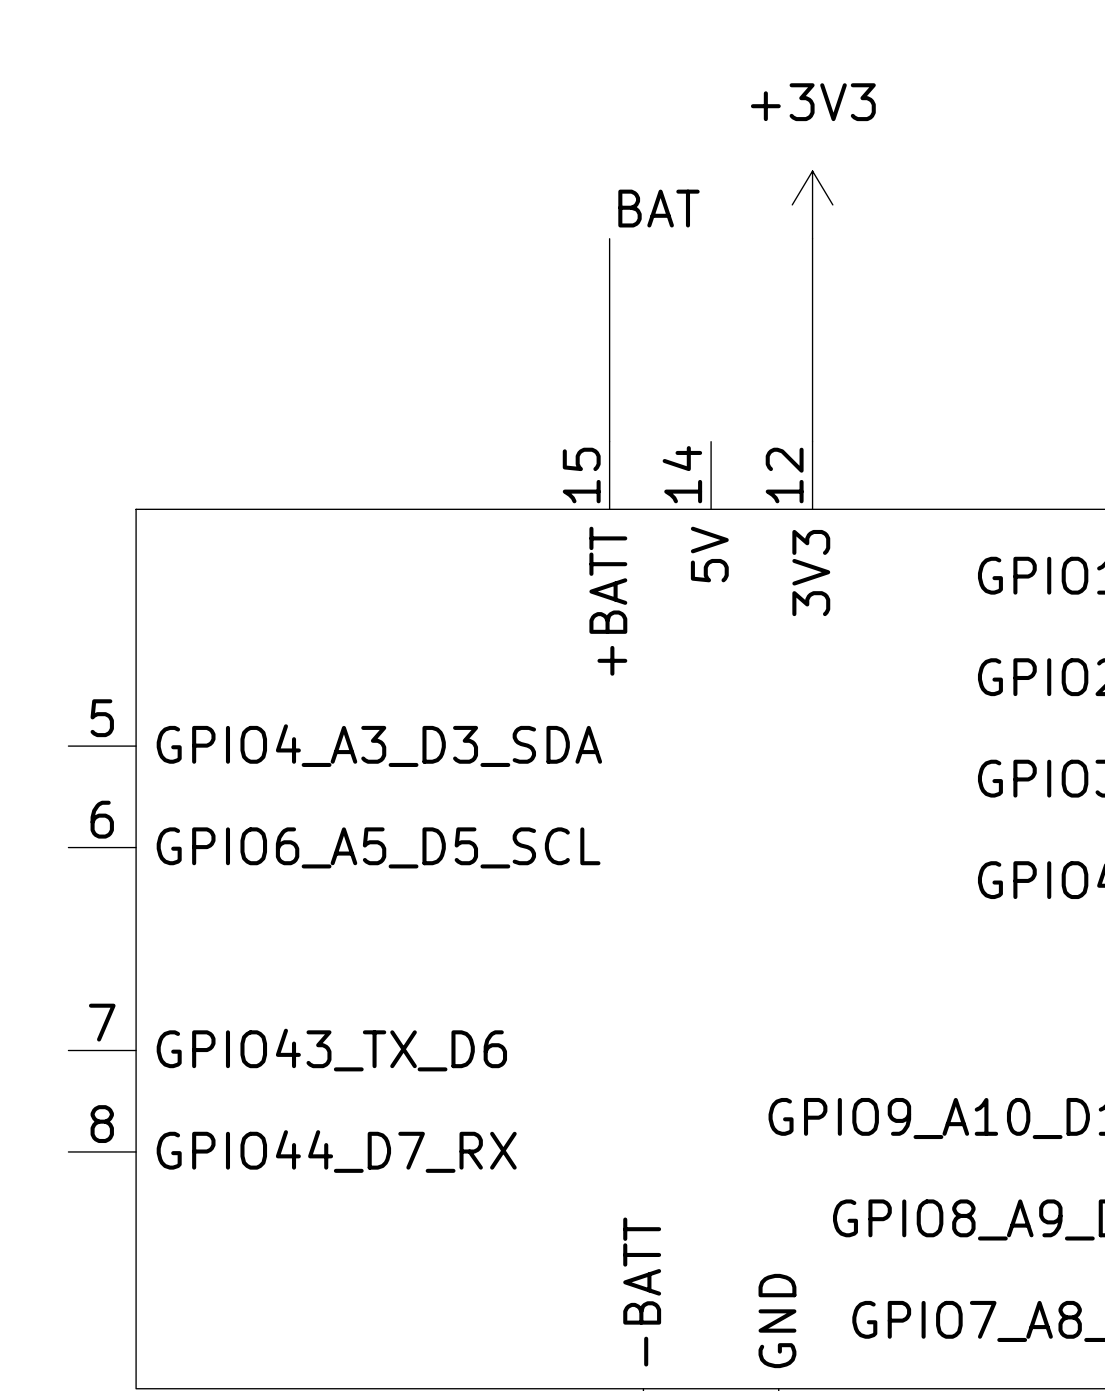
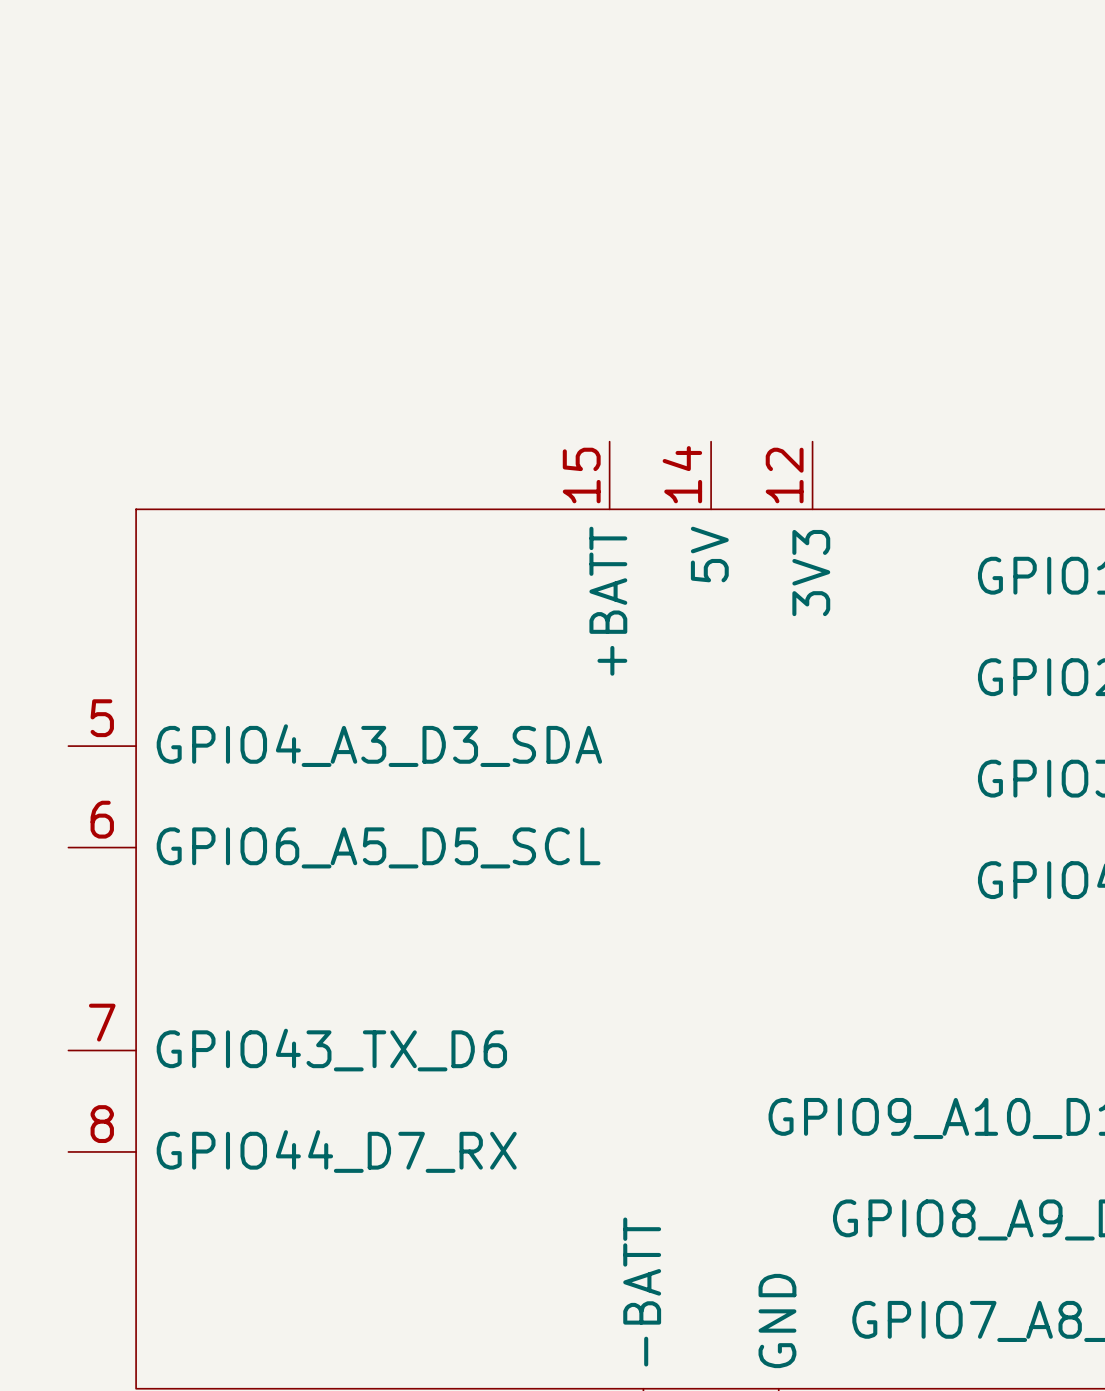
power symbol: +3V3 (812, 204) -> none
label: BAT (658, 208) -> none
wire: (609, 238) (609, 441) -> none
wire: (812, 238) (812, 441) -> none

